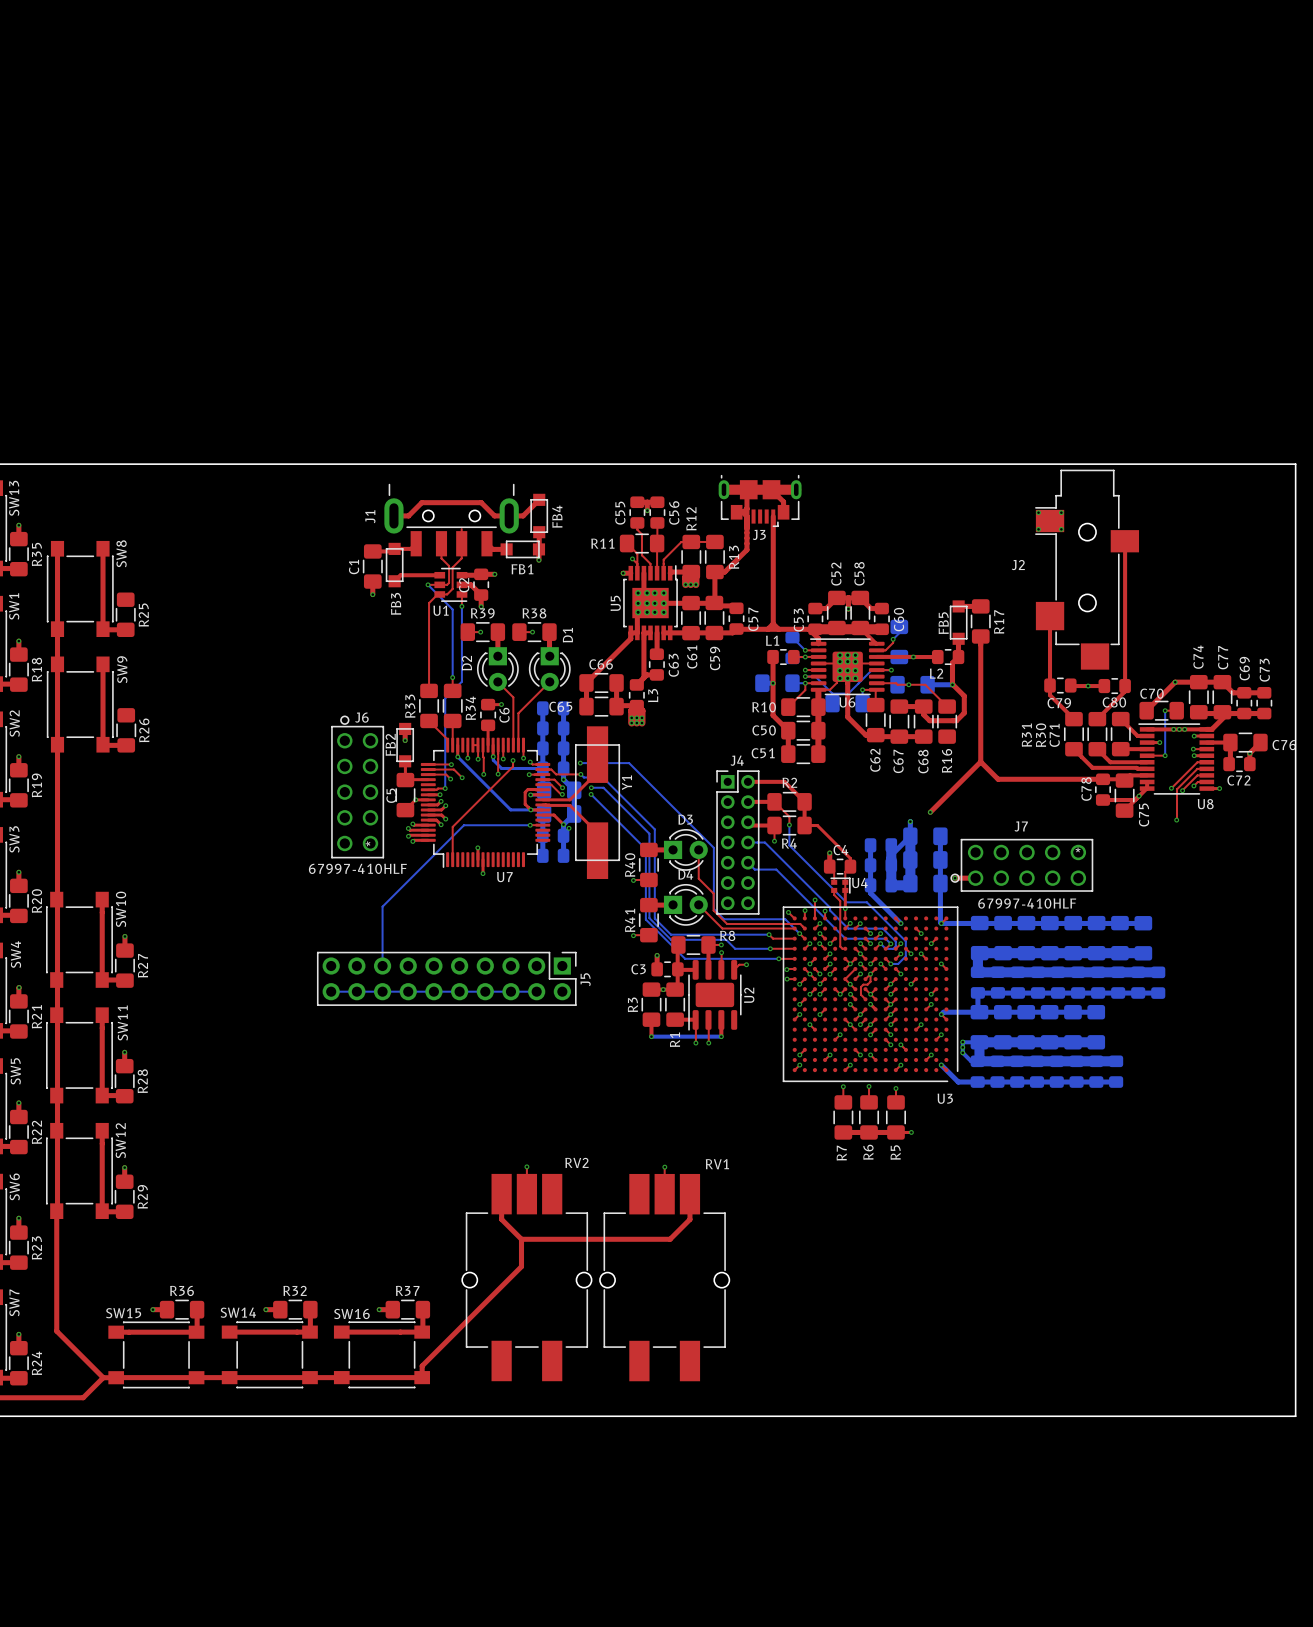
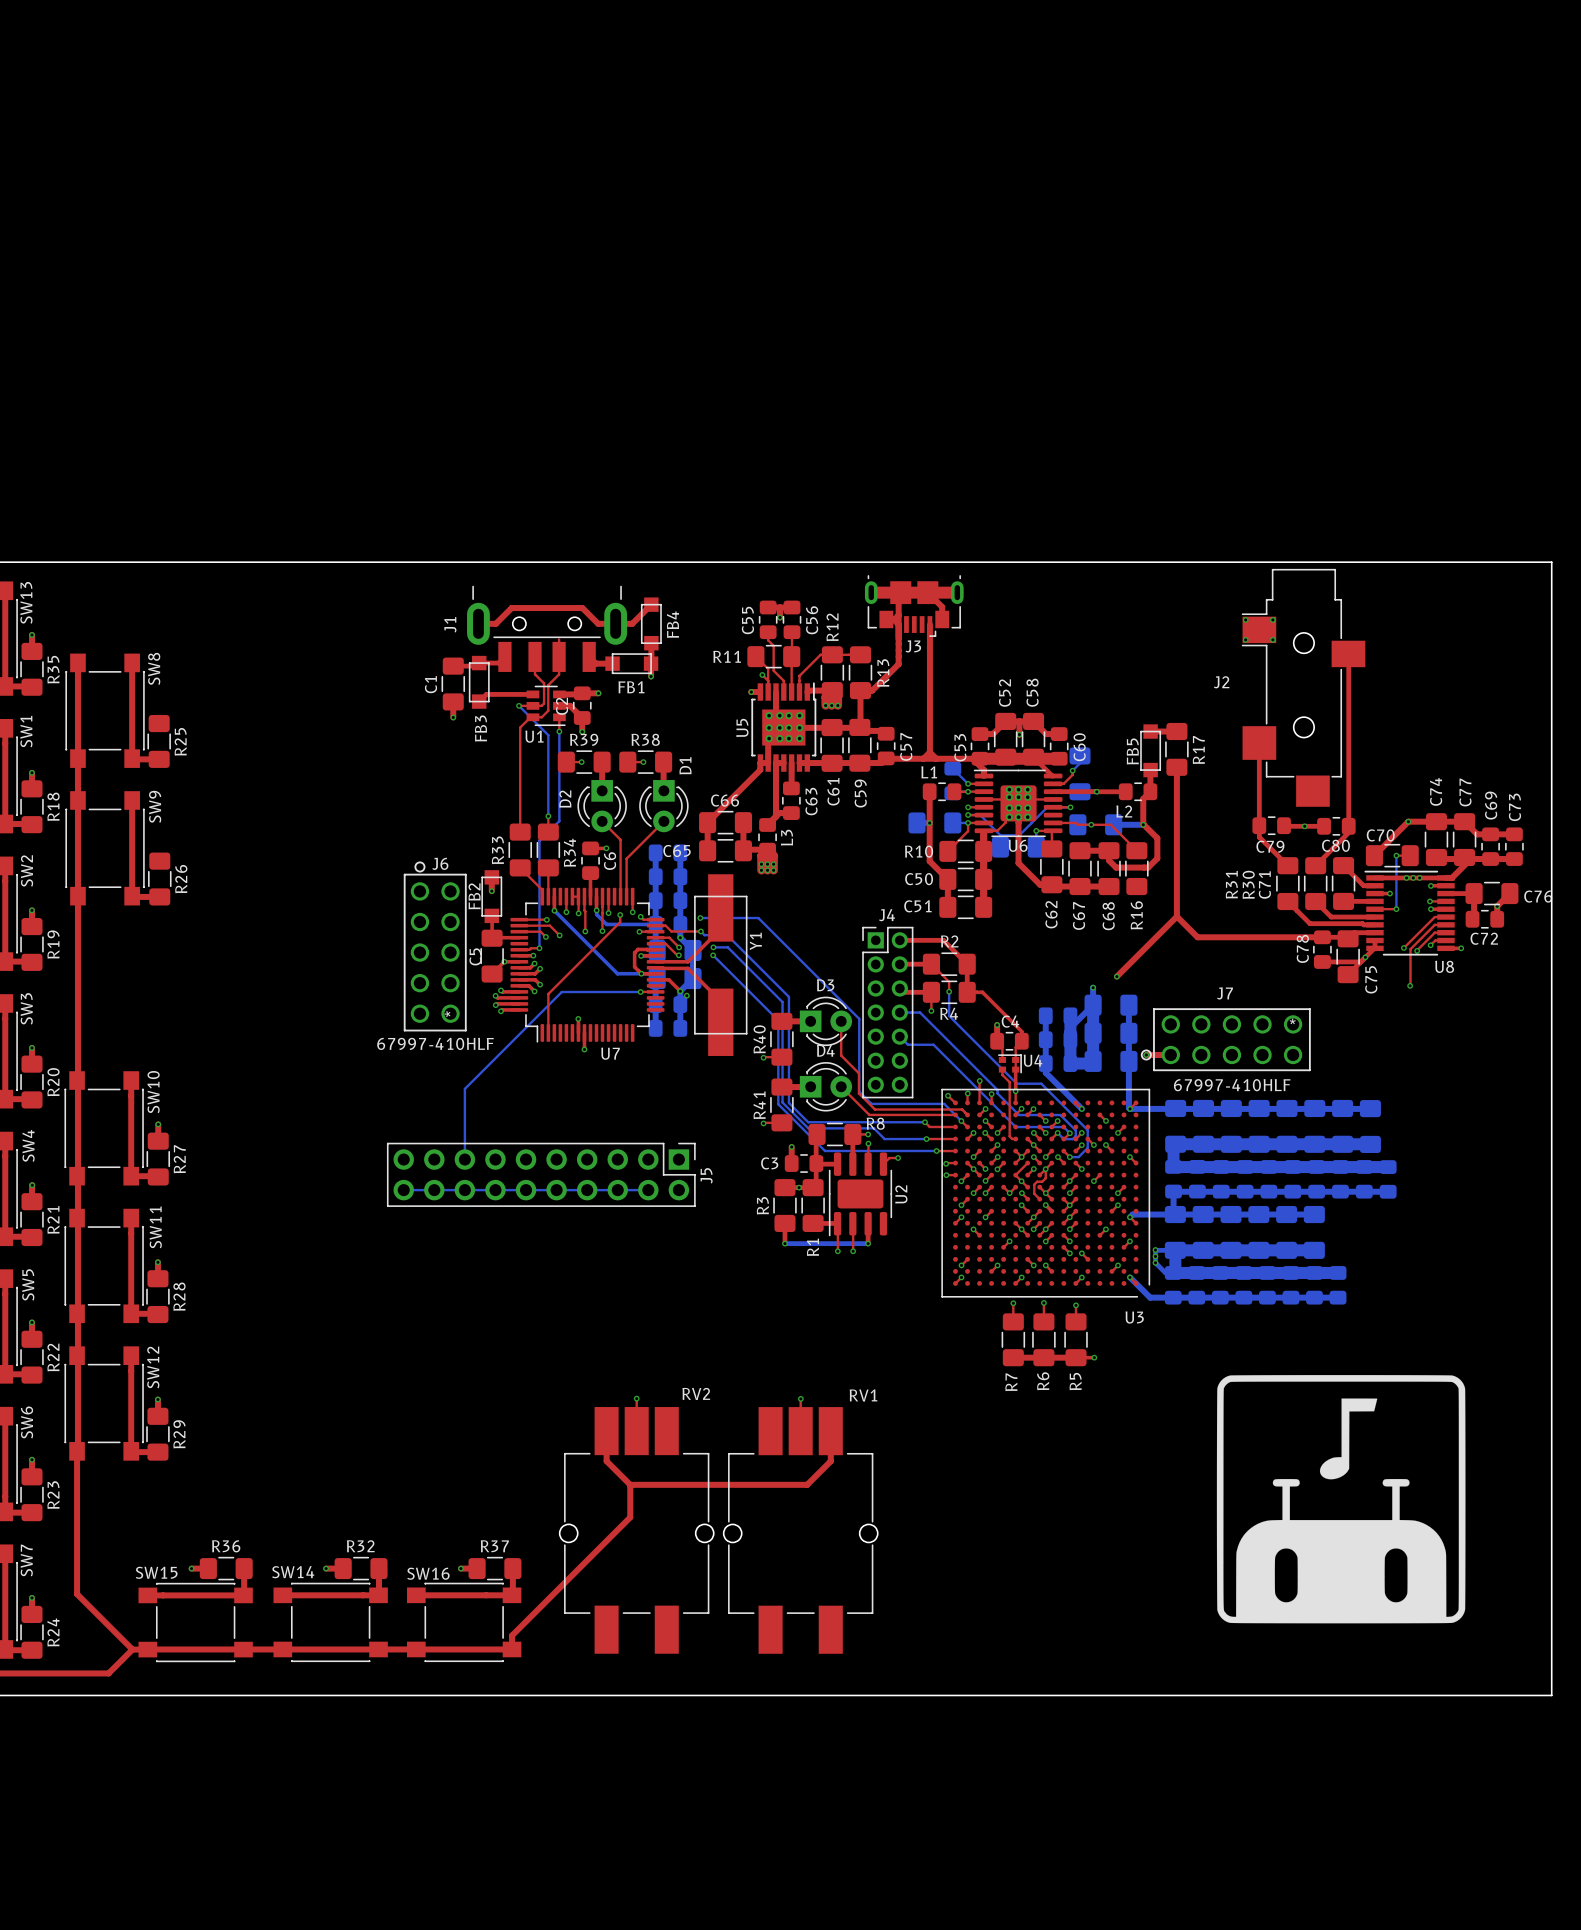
drawing: none -> [1216, 1375, 1466, 1624]

